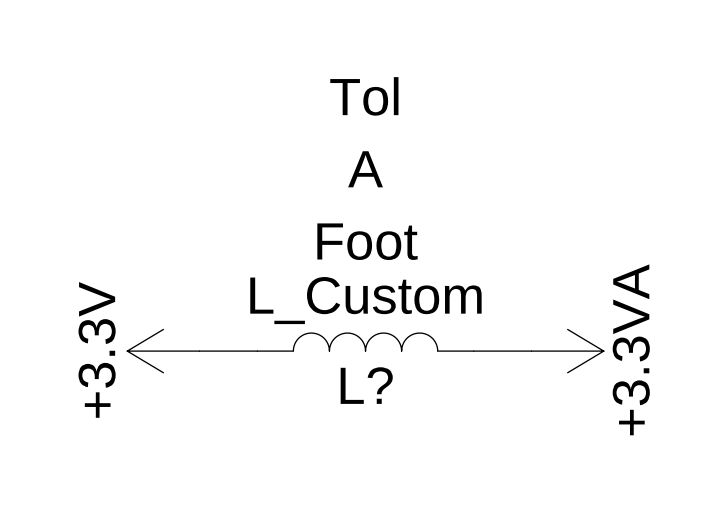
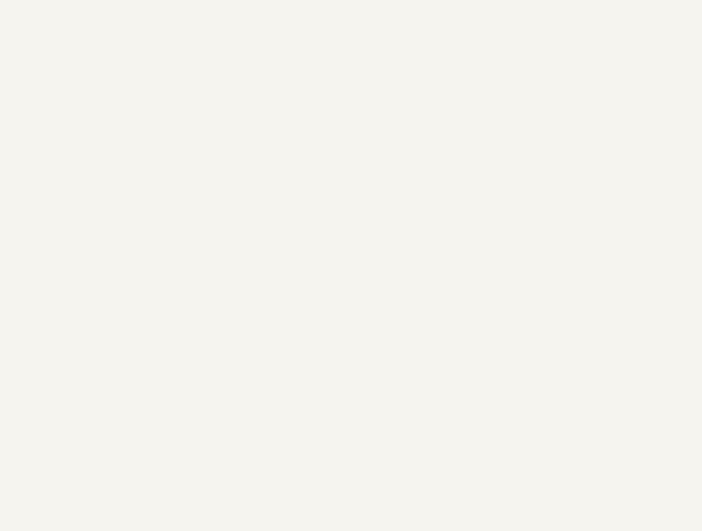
L?: L_Custom (365, 342) -> none
power symbol: +3.3V (163, 351) -> none
wire: (199, 351) (257, 351) -> none
wire: (473, 351) (531, 351) -> none
power symbol: +3.3VA (567, 351) -> none

